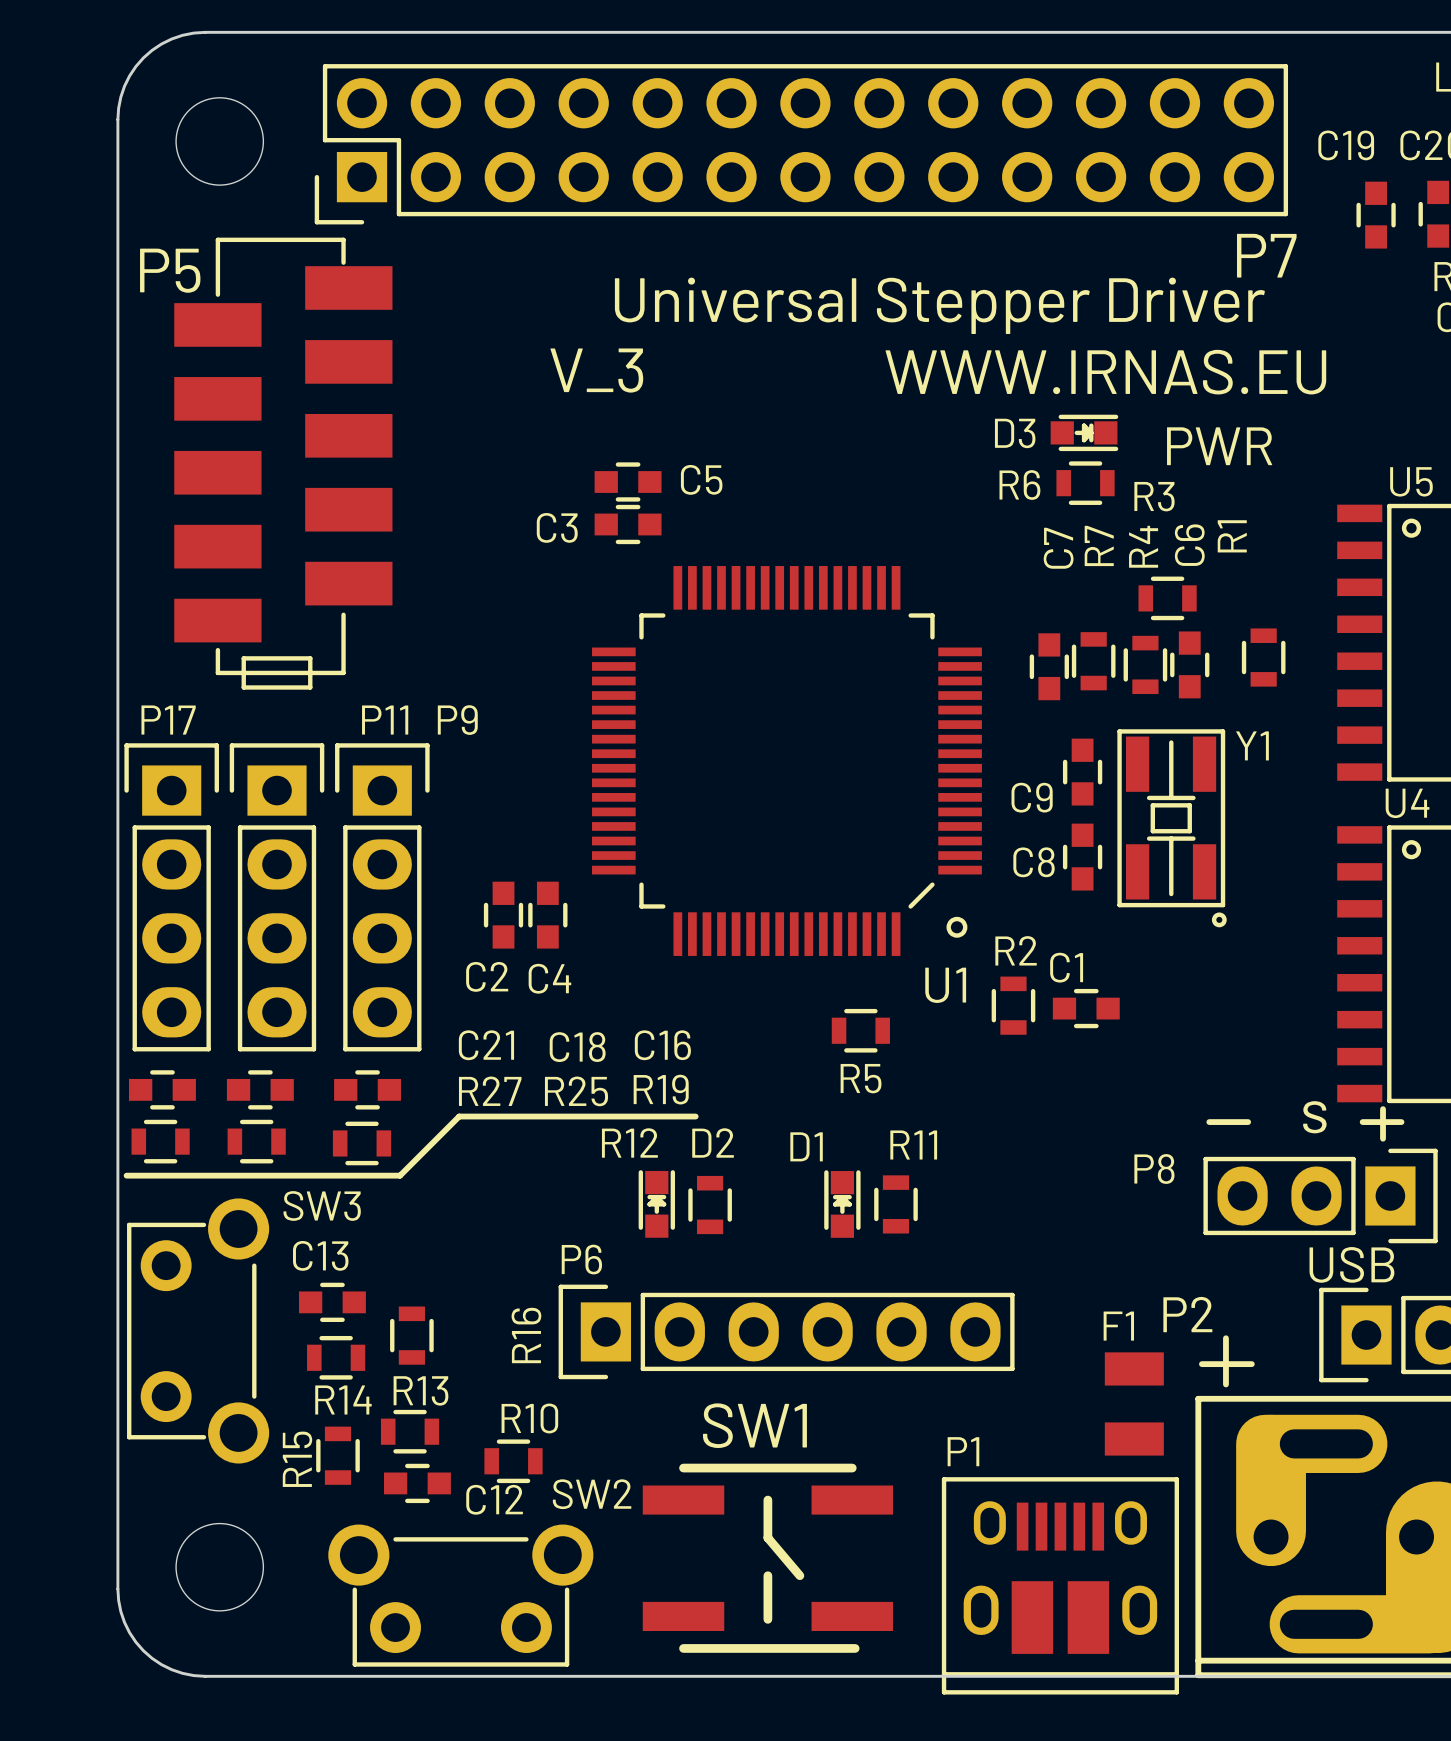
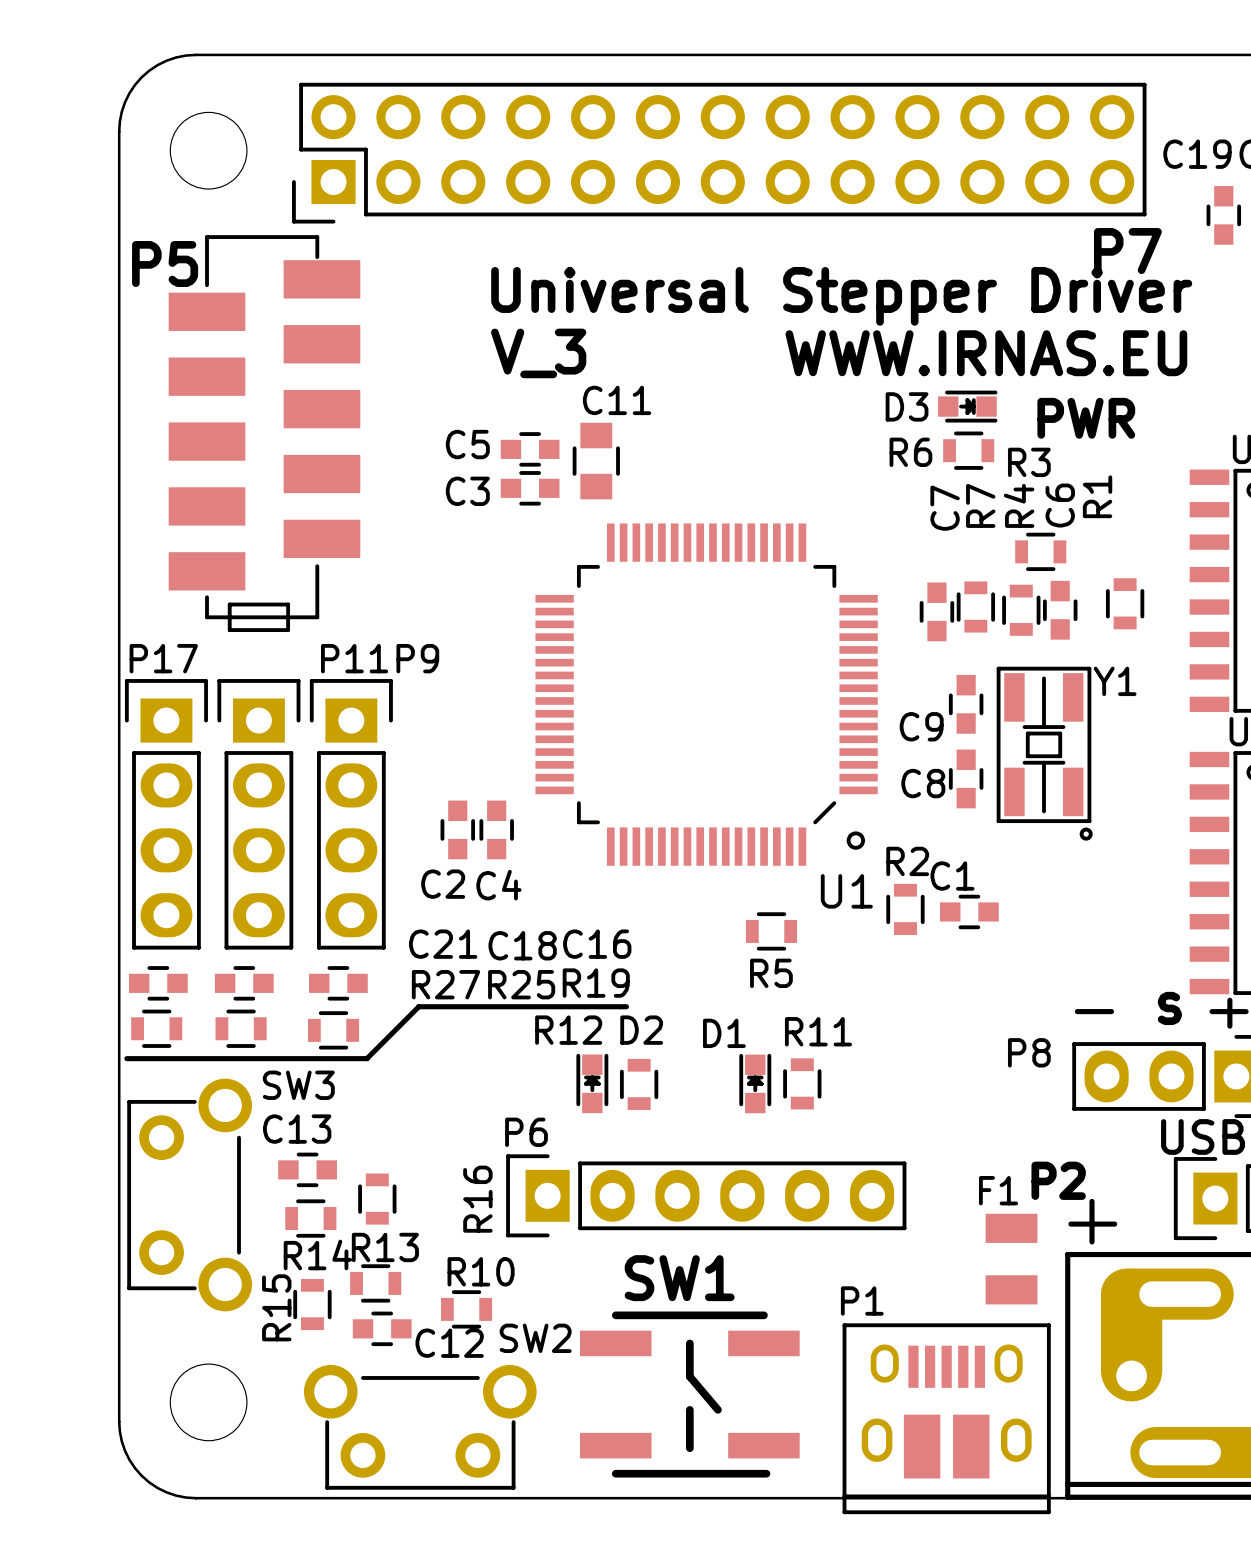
C5 name position: C5 (701, 479) -> C5 (467, 444)
C5 position: (628, 481) -> (530, 449)
C11: none -> (596, 461)
C3 position: (628, 524) -> (530, 488)

